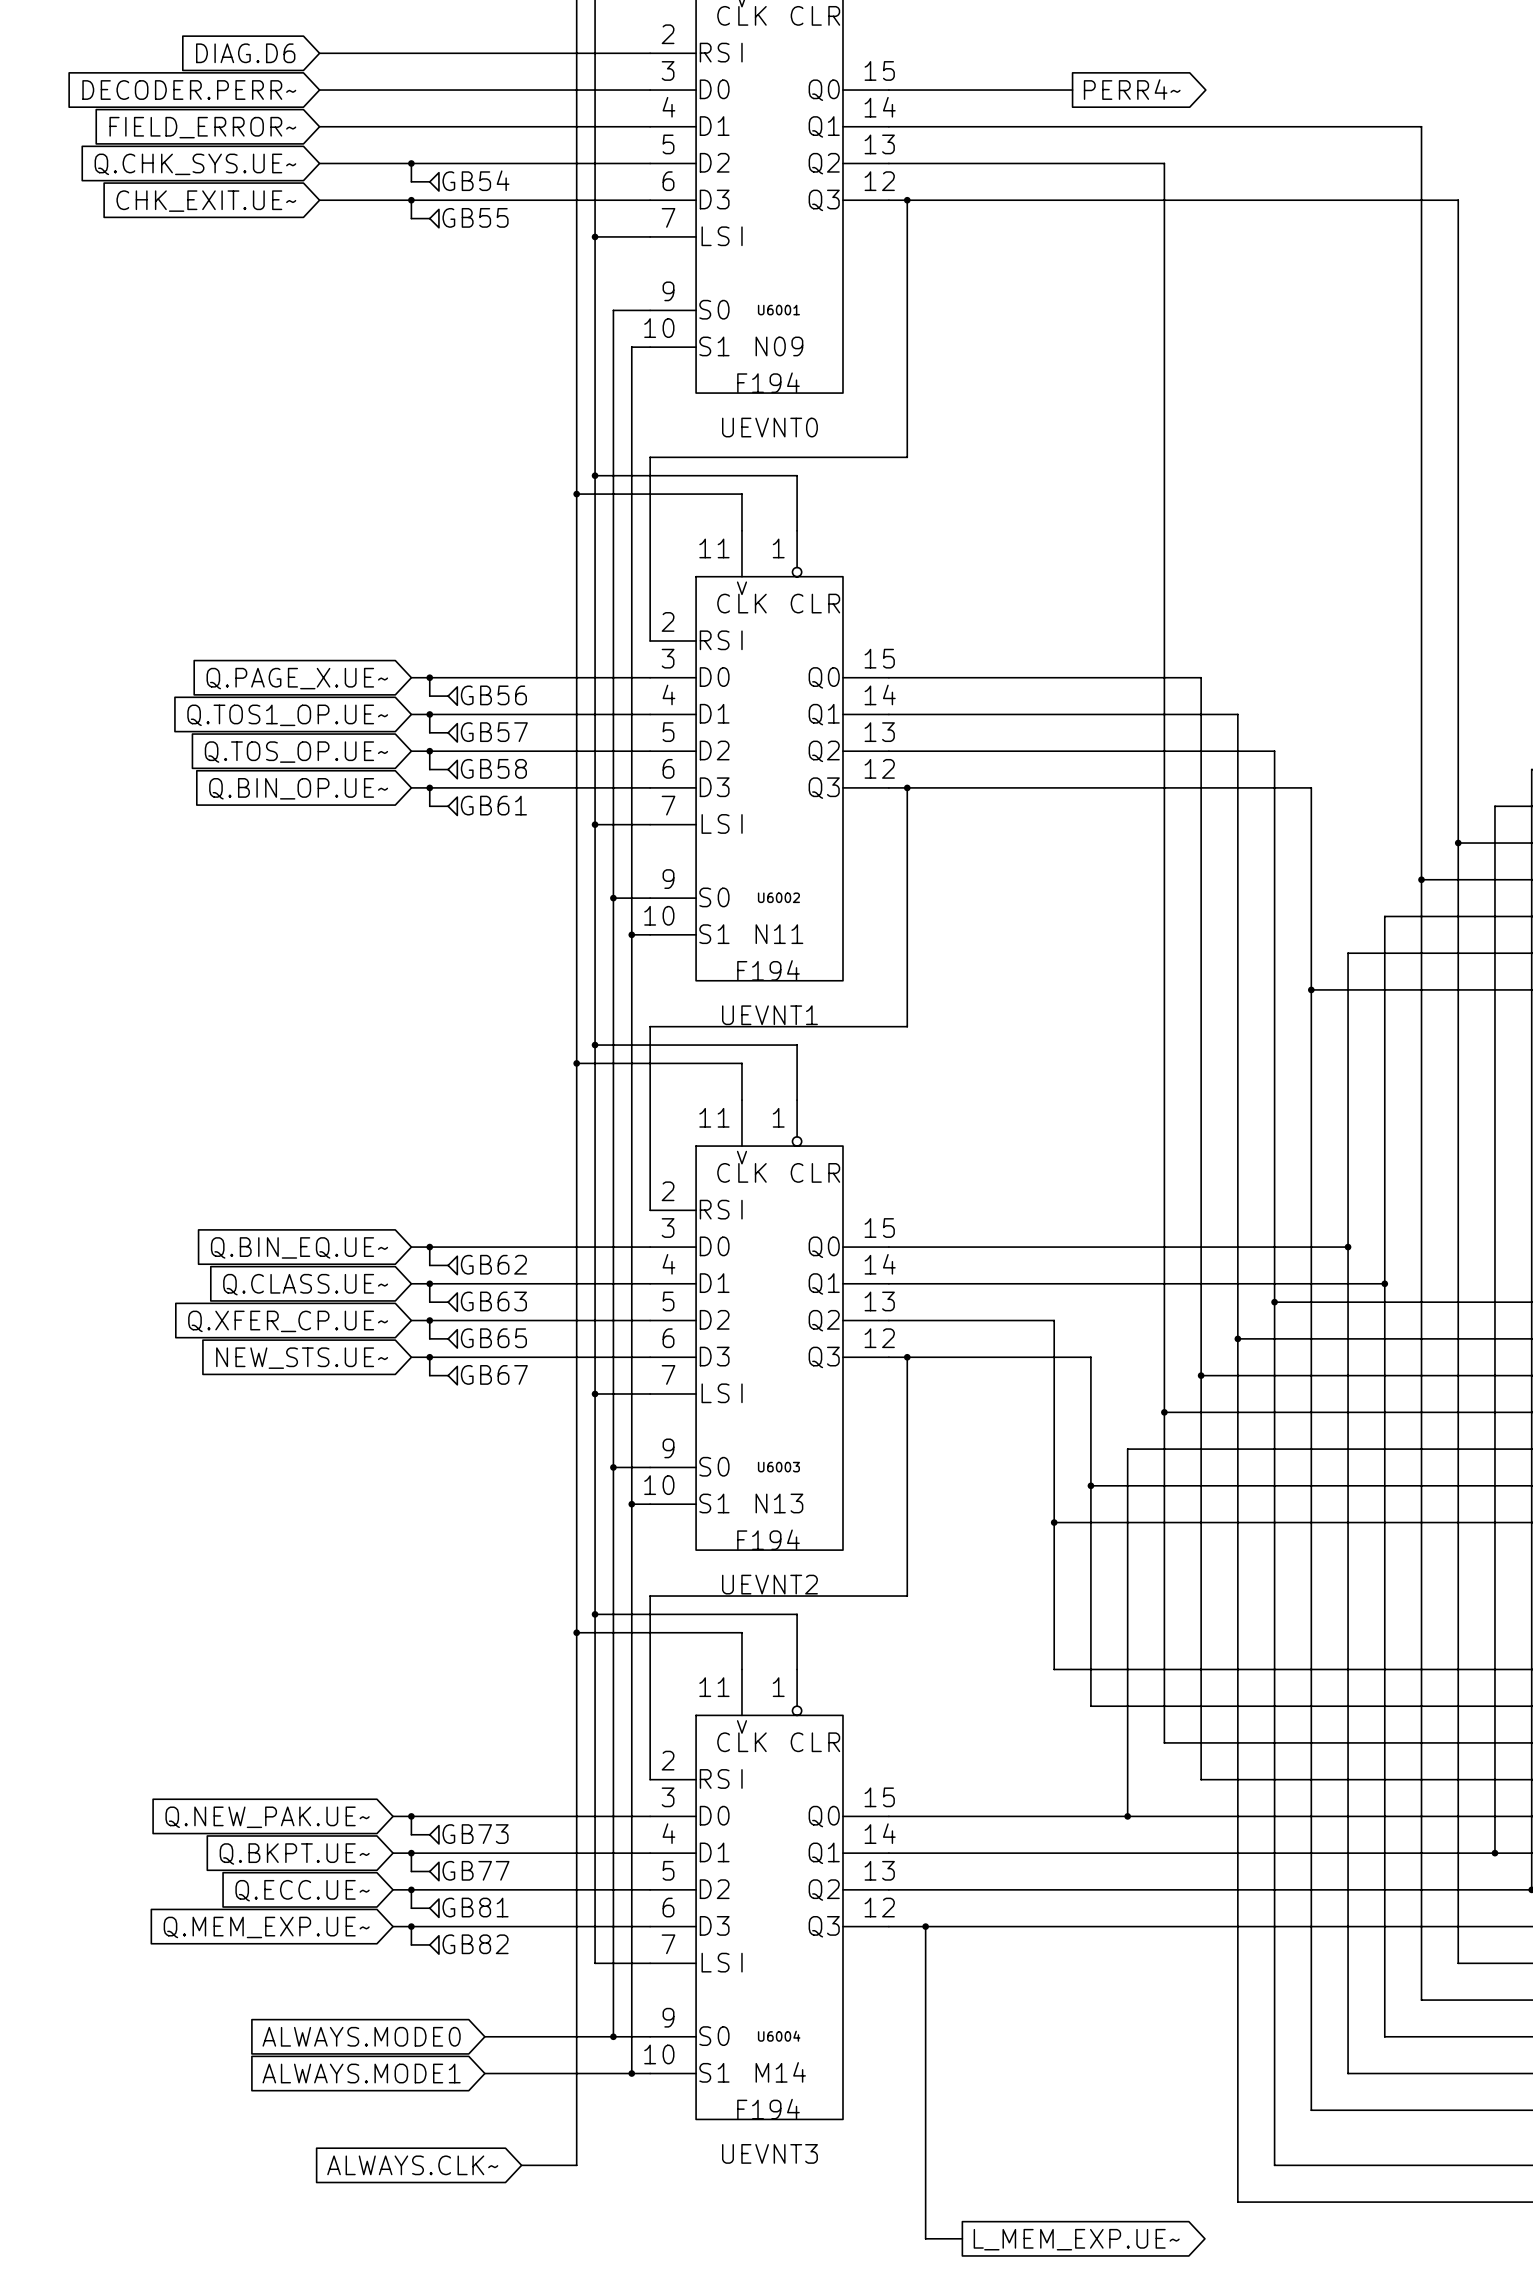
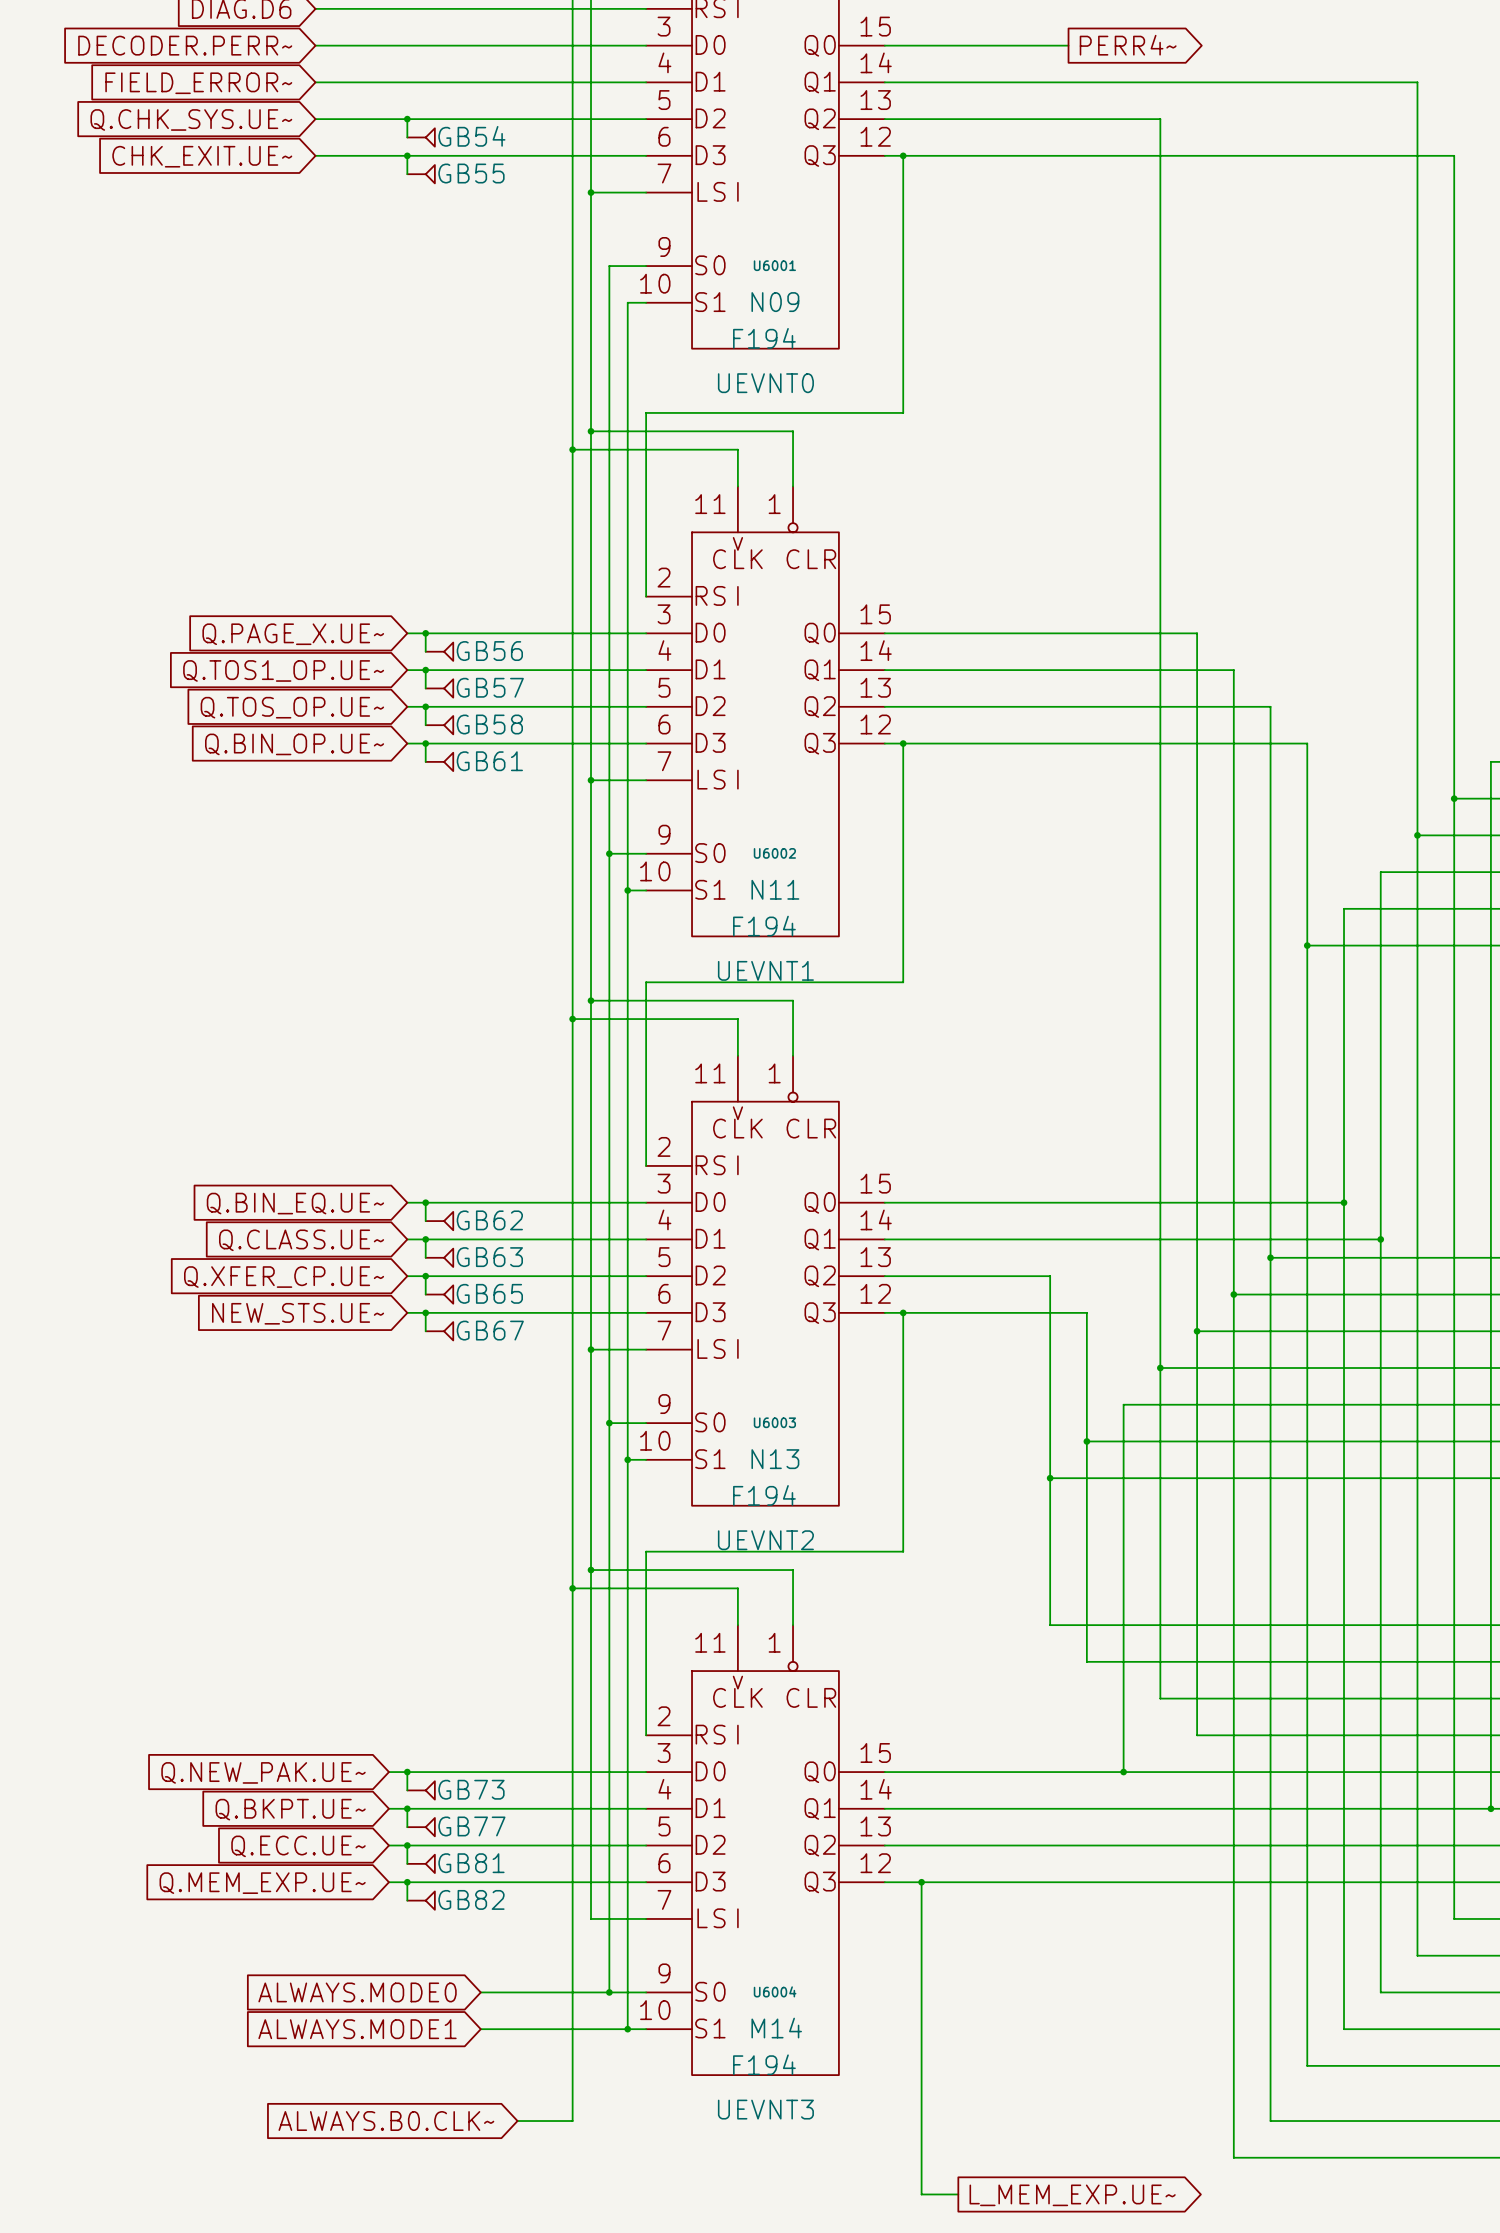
global label: ALWAYS.CLK~ (412, 2165) -> ALWAYS.B0.CLK~ (386, 2121)

